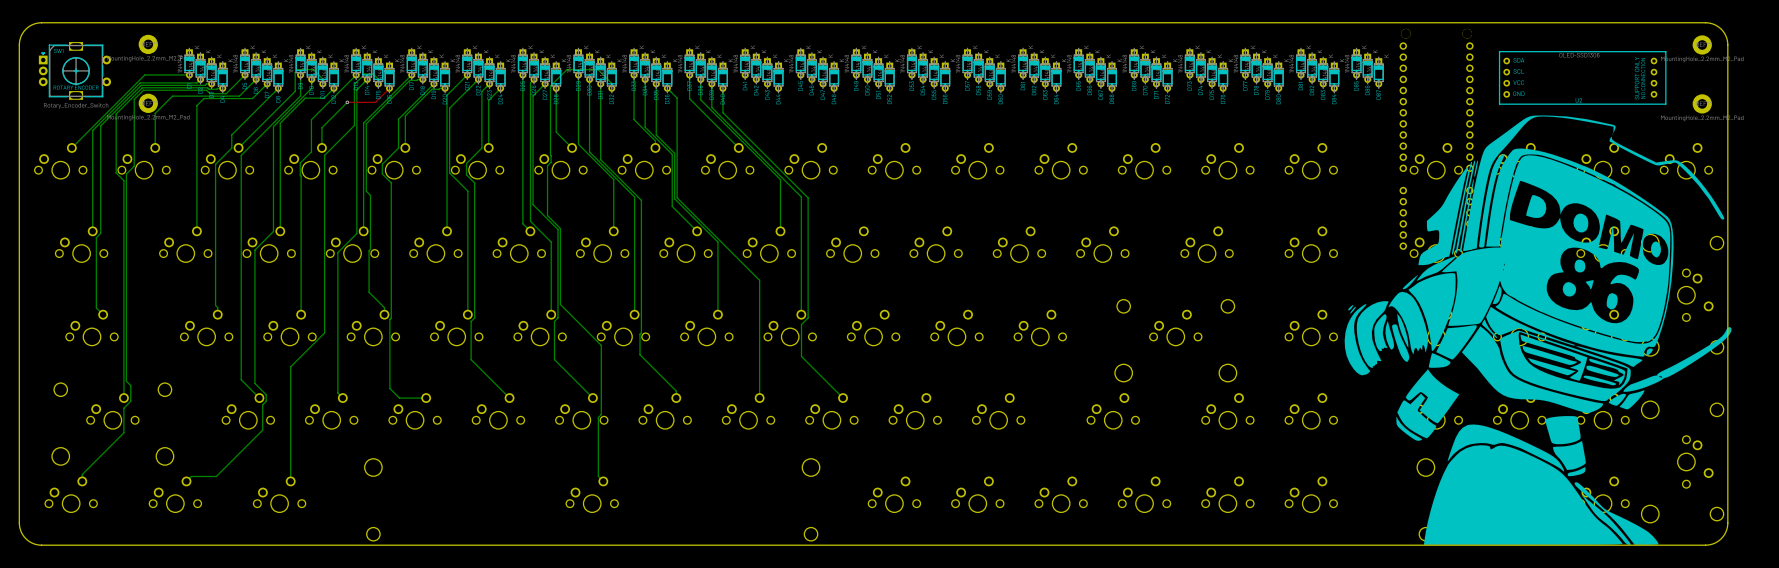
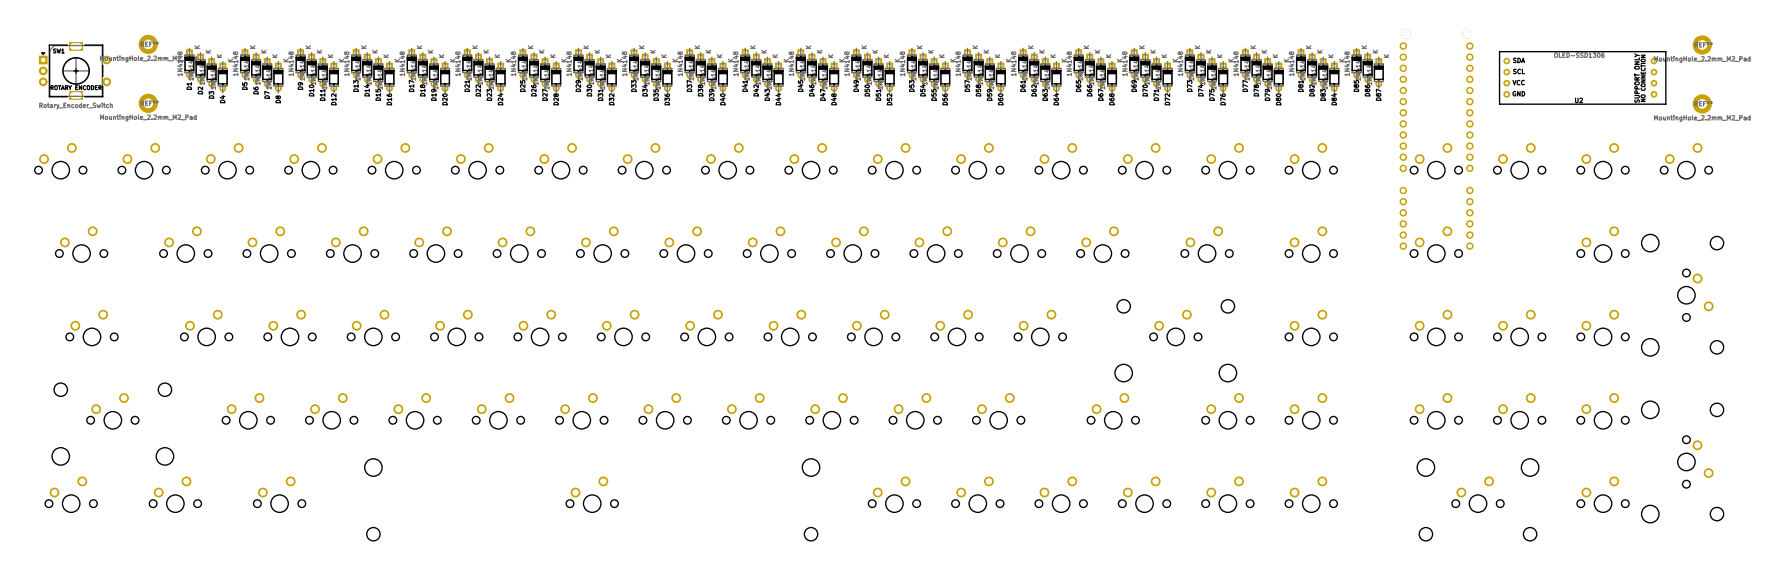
board edge: (41, 22) (1712, 24) (1724, 33) (1727, 44) (1726, 530) (1717, 541) (1705, 545) (34, 543) (24, 536) (19, 522) (19, 44) (21, 35) (25, 29) (31, 24) (41, 22) -> none
bottom track: (189, 75) (144, 75) (71, 147) -> none
bottom track: (244, 75) (226, 93) (210, 93) (206, 90) (143, 90) (134, 99) (134, 166) (126, 174) (126, 381) (130, 385) (130, 401) (123, 408) (123, 432) (82, 474) (82, 481) -> none
bottom track: (300, 75) (300, 96) (241, 155) (241, 379) (259, 398) -> none
bottom track: (356, 75) (311, 119) (311, 151) (300, 163) (301, 314) -> none
bottom track: (411, 75) (363, 123) (363, 231) -> none
bottom track: (467, 75) (447, 95) (447, 231) -> none
bottom track: (522, 75) (522, 223) (530, 231) -> none
bottom track: (578, 75) (578, 144) (613, 179) (613, 231) -> none
bottom track: (634, 75) (634, 119) (655, 140) (655, 147) -> none
bottom track: (689, 75) (689, 98) (738, 147) -> none
bottom track: (200, 79) (197, 82) (140, 82) (92, 130) (92, 231) -> none
bottom track: (256, 79) (239, 96) (172, 96) (155, 113) (155, 147) -> none
bottom track: (311, 79) (311, 88) (273, 126) (273, 231) (254, 250) (254, 383) (266, 394) (266, 401) (262, 404) (262, 430) (216, 476) (191, 476) (186, 481) -> none
bottom track: (367, 79) (356, 89) (356, 233) (337, 252) (337, 393) (342, 398) -> none
bottom track: (422, 79) (409, 80) (366, 123) (366, 191) (370, 195) (369, 292) (384, 307) (384, 314) -> none
bottom track: (478, 79) (449, 108) (449, 172) (467, 191) (467, 314) -> none
bottom track: (534, 79) (530, 82) (530, 221) (551, 242) (551, 314) -> none
bottom track: (589, 79) (589, 151) (634, 196) (634, 314) -> none
bottom track: (645, 79) (645, 127) (672, 154) (672, 206) (697, 231) -> none
bottom track: (700, 79) (700, 99) (780, 179) (780, 231) -> none
bottom track: (211, 83) (141, 85) (100, 125) (100, 233) (96, 237) (96, 307) (103, 314) -> none
bottom track: (267, 83) (252, 98) (204, 98) (196, 105) (196, 231) -> none
bottom track: (322, 83) (322, 78) (313, 69) (297, 69) (295, 72) (295, 91) (238, 147) -> none
bottom track: (378, 83) (378, 78) (373, 74) (364, 74) (354, 84) (354, 125) (324, 155) (324, 332) (290, 366) (290, 481) -> none
bottom track: (433, 83) (398, 119) (398, 148) (382, 164) (382, 173) (391, 182) (389, 388) (399, 398) (426, 398) -> none
bottom track: (489, 83) (481, 91) (481, 148) (466, 163) (466, 174) (474, 182) (474, 317) (471, 321) (471, 359) (509, 398) -> none
bottom track: (545, 83) (533, 95) (533, 204) (558, 229) (558, 317) (554, 321) (554, 359) (592, 398) -> none
bottom track: (600, 83) (600, 159) (641, 200) (640, 354) (676, 391) (676, 398) -> none
bottom track: (656, 83) (656, 134) (674, 153) (674, 198) (717, 242) (717, 314) -> none
bottom track: (711, 83) (711, 107) (801, 196) (801, 314) -> none
bottom track: (222, 88) (142, 87) (116, 113) (116, 172) (123, 180) (123, 398) -> none
bottom track: (278, 88) (231, 134) (231, 148) (215, 164) (215, 305) (217, 307) (217, 314) -> none
bottom track: (333, 88) (324, 98) (305, 98) (280, 123) (280, 231) -> none
top track: (389, 88) (375, 102) (347, 102) -> none
bottom track: (445, 88) (432, 89) (405, 115) (405, 147) -> none
bottom track: (500, 88) (488, 100) (488, 147) -> none
bottom track: (556, 88) (556, 132) (572, 147) -> none
bottom track: (611, 88) (611, 83) (598, 69) (566, 69) (550, 86) (551, 162) (547, 165) (547, 215) (560, 228) (560, 304) (601, 345) (601, 414) (598, 417) (598, 476) (603, 481) -> none
bottom track: (667, 88) (677, 98) (677, 197) (759, 280) (759, 398) -> none
bottom track: (722, 88) (722, 112) (808, 197) (808, 317) (801, 324) (801, 356) (843, 398) -> none
bottom track: (347, 102) (321, 127) (321, 147) -> none
via: (347, 102) -> none
drawing: [1344, 115, 1732, 545] -> none

